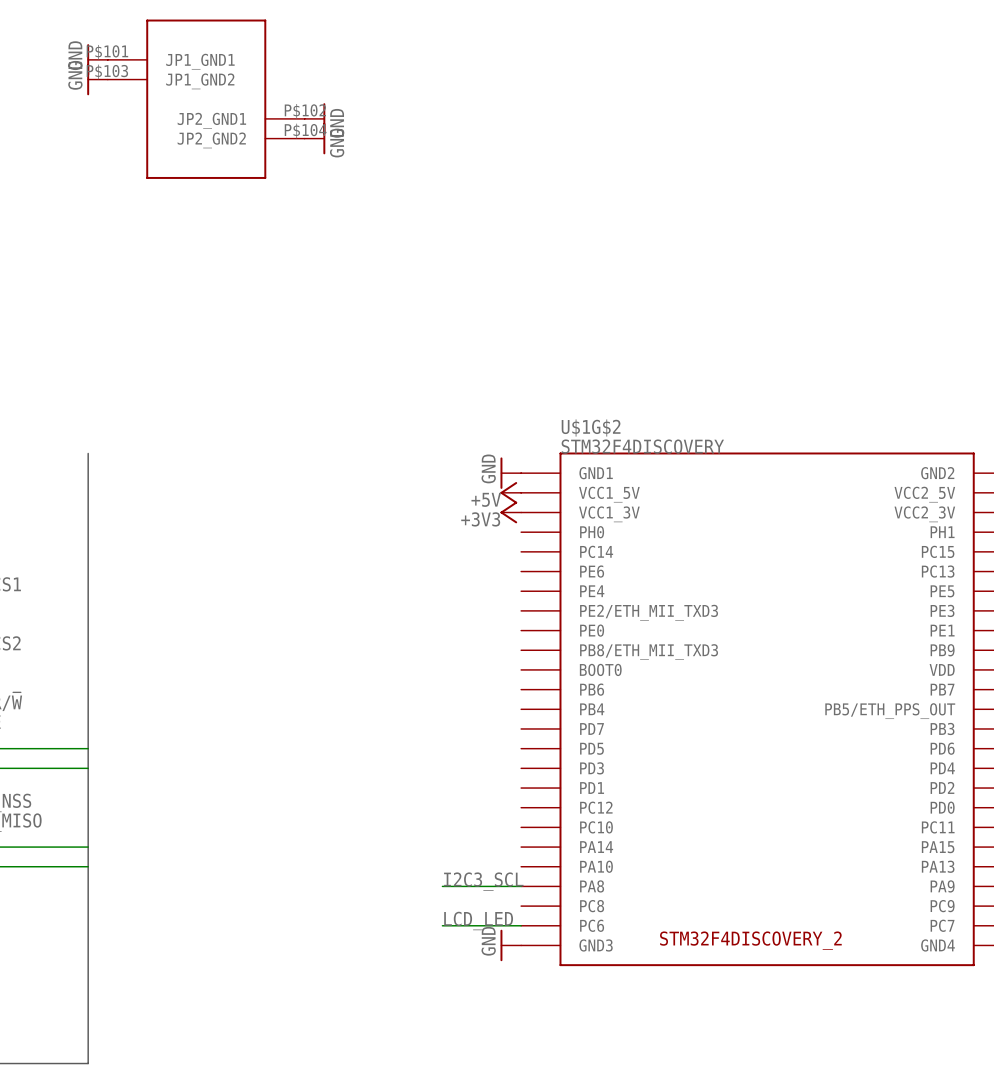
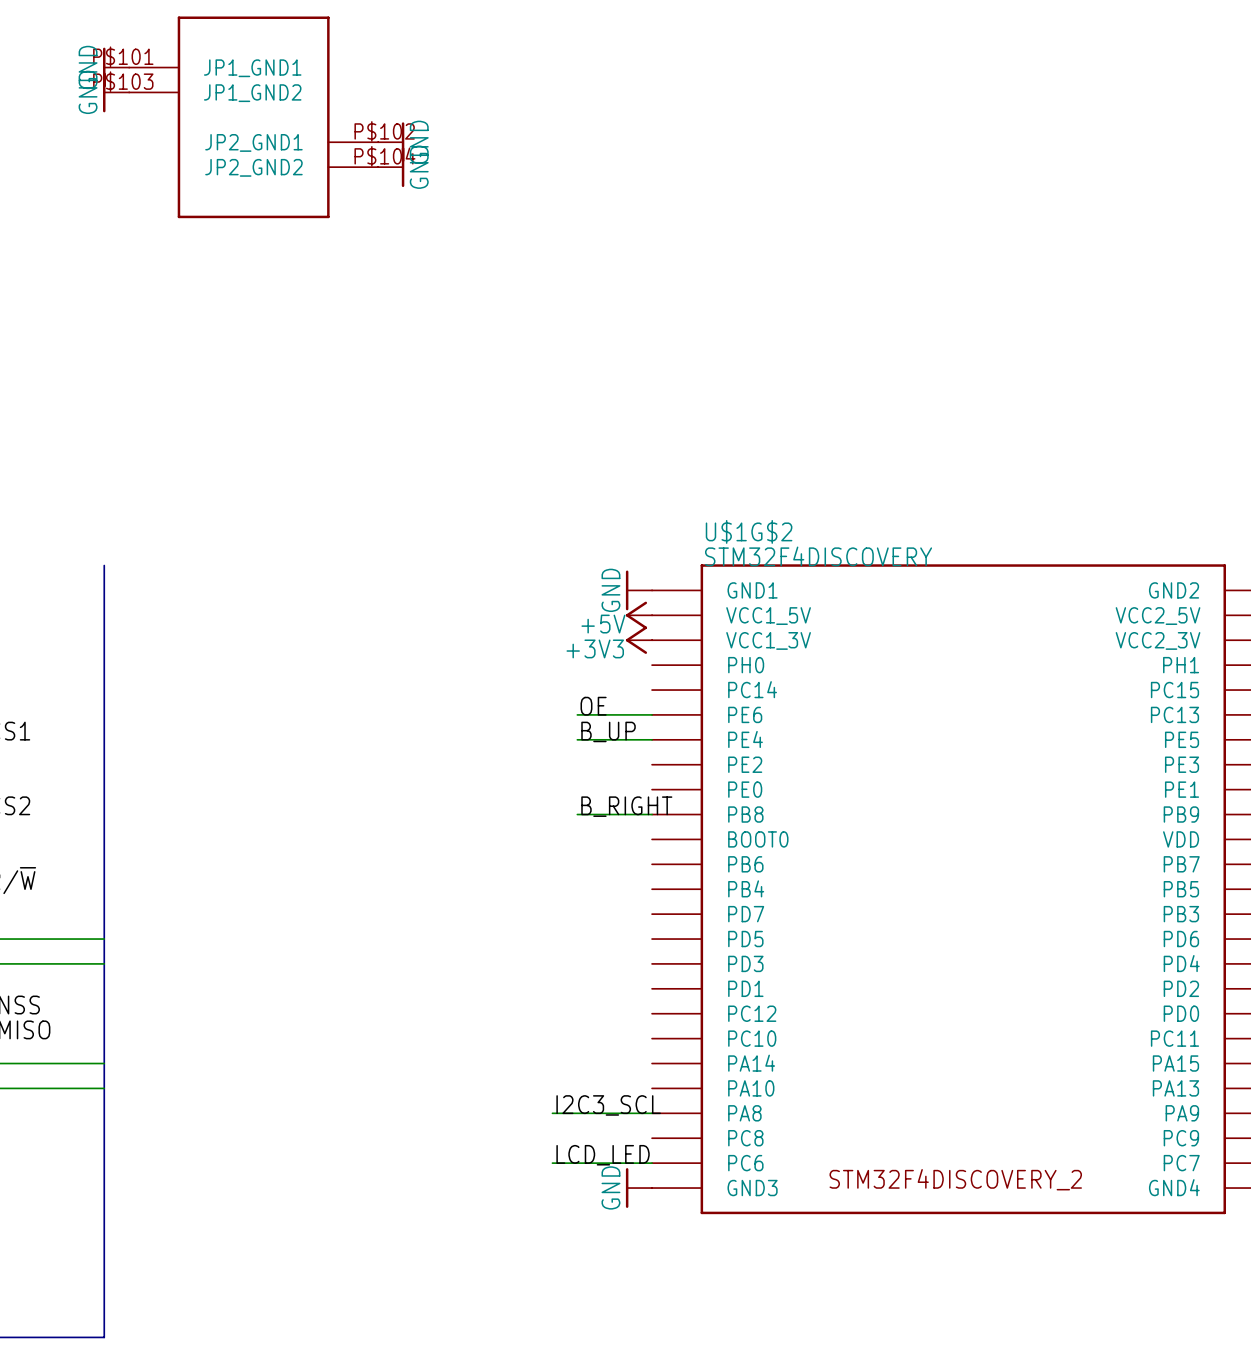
label: none -> OE (593, 706)
wire: none -> (577, 714) (652, 714)
label: none -> B_UP (608, 731)
wire: none -> (577, 739) (652, 739)
U$1G$2 pin name: PE2/ETH_MII_TXD3 (649, 612) -> PE2 (745, 764)
label: none -> B_RIGHT (626, 806)
wire: none -> (577, 814) (652, 814)
U$1G$2 pin name: PB8/ETH_MII_TXD3 (649, 652) -> PB8 (745, 814)
U$1G$2 pin name: PB5/ETH_PPS_OUT (890, 711) -> PB5 (1181, 889)

